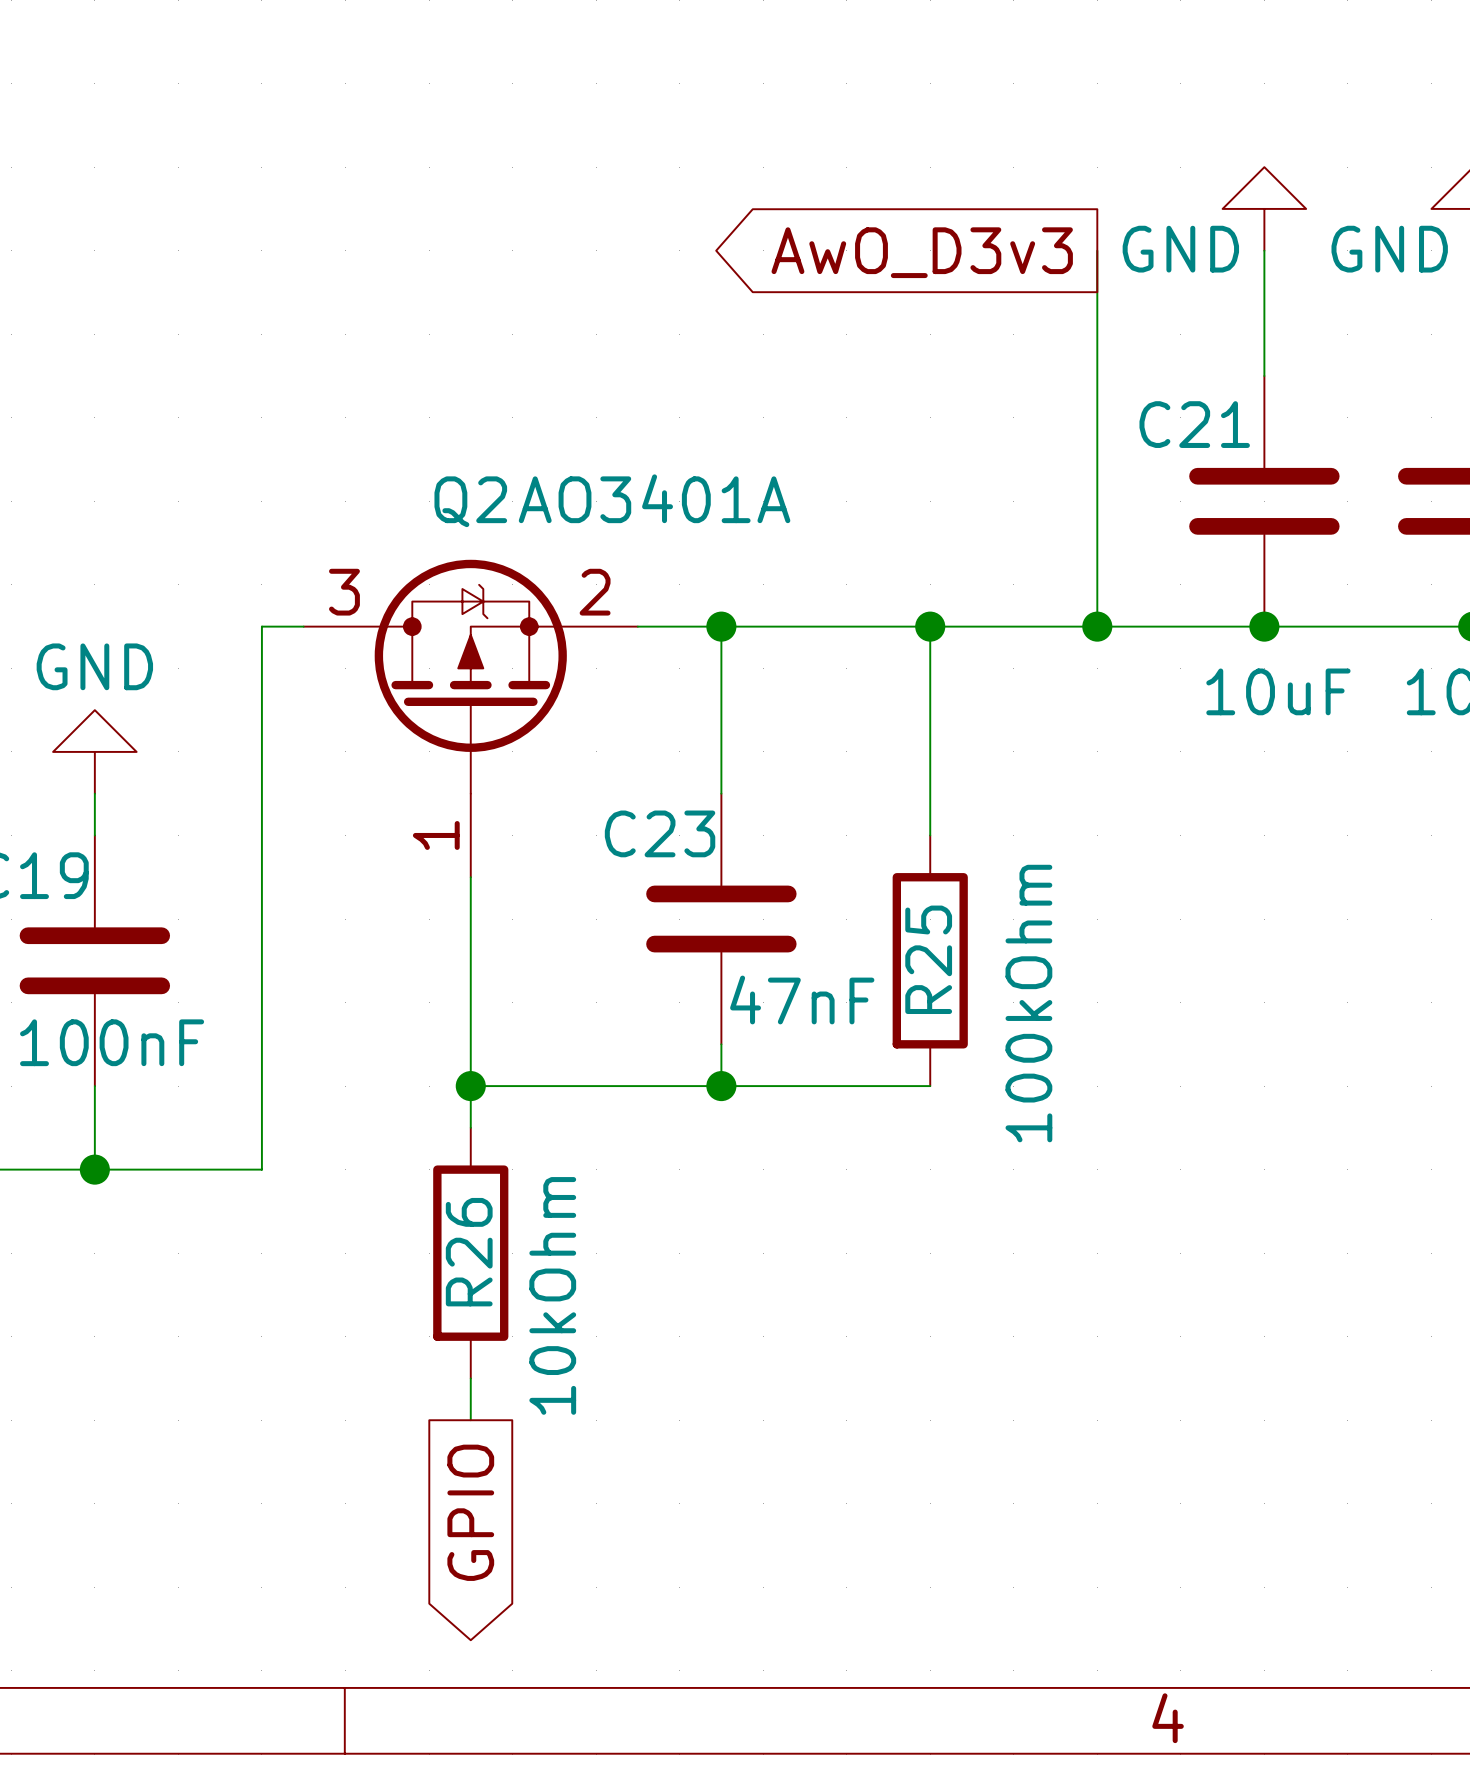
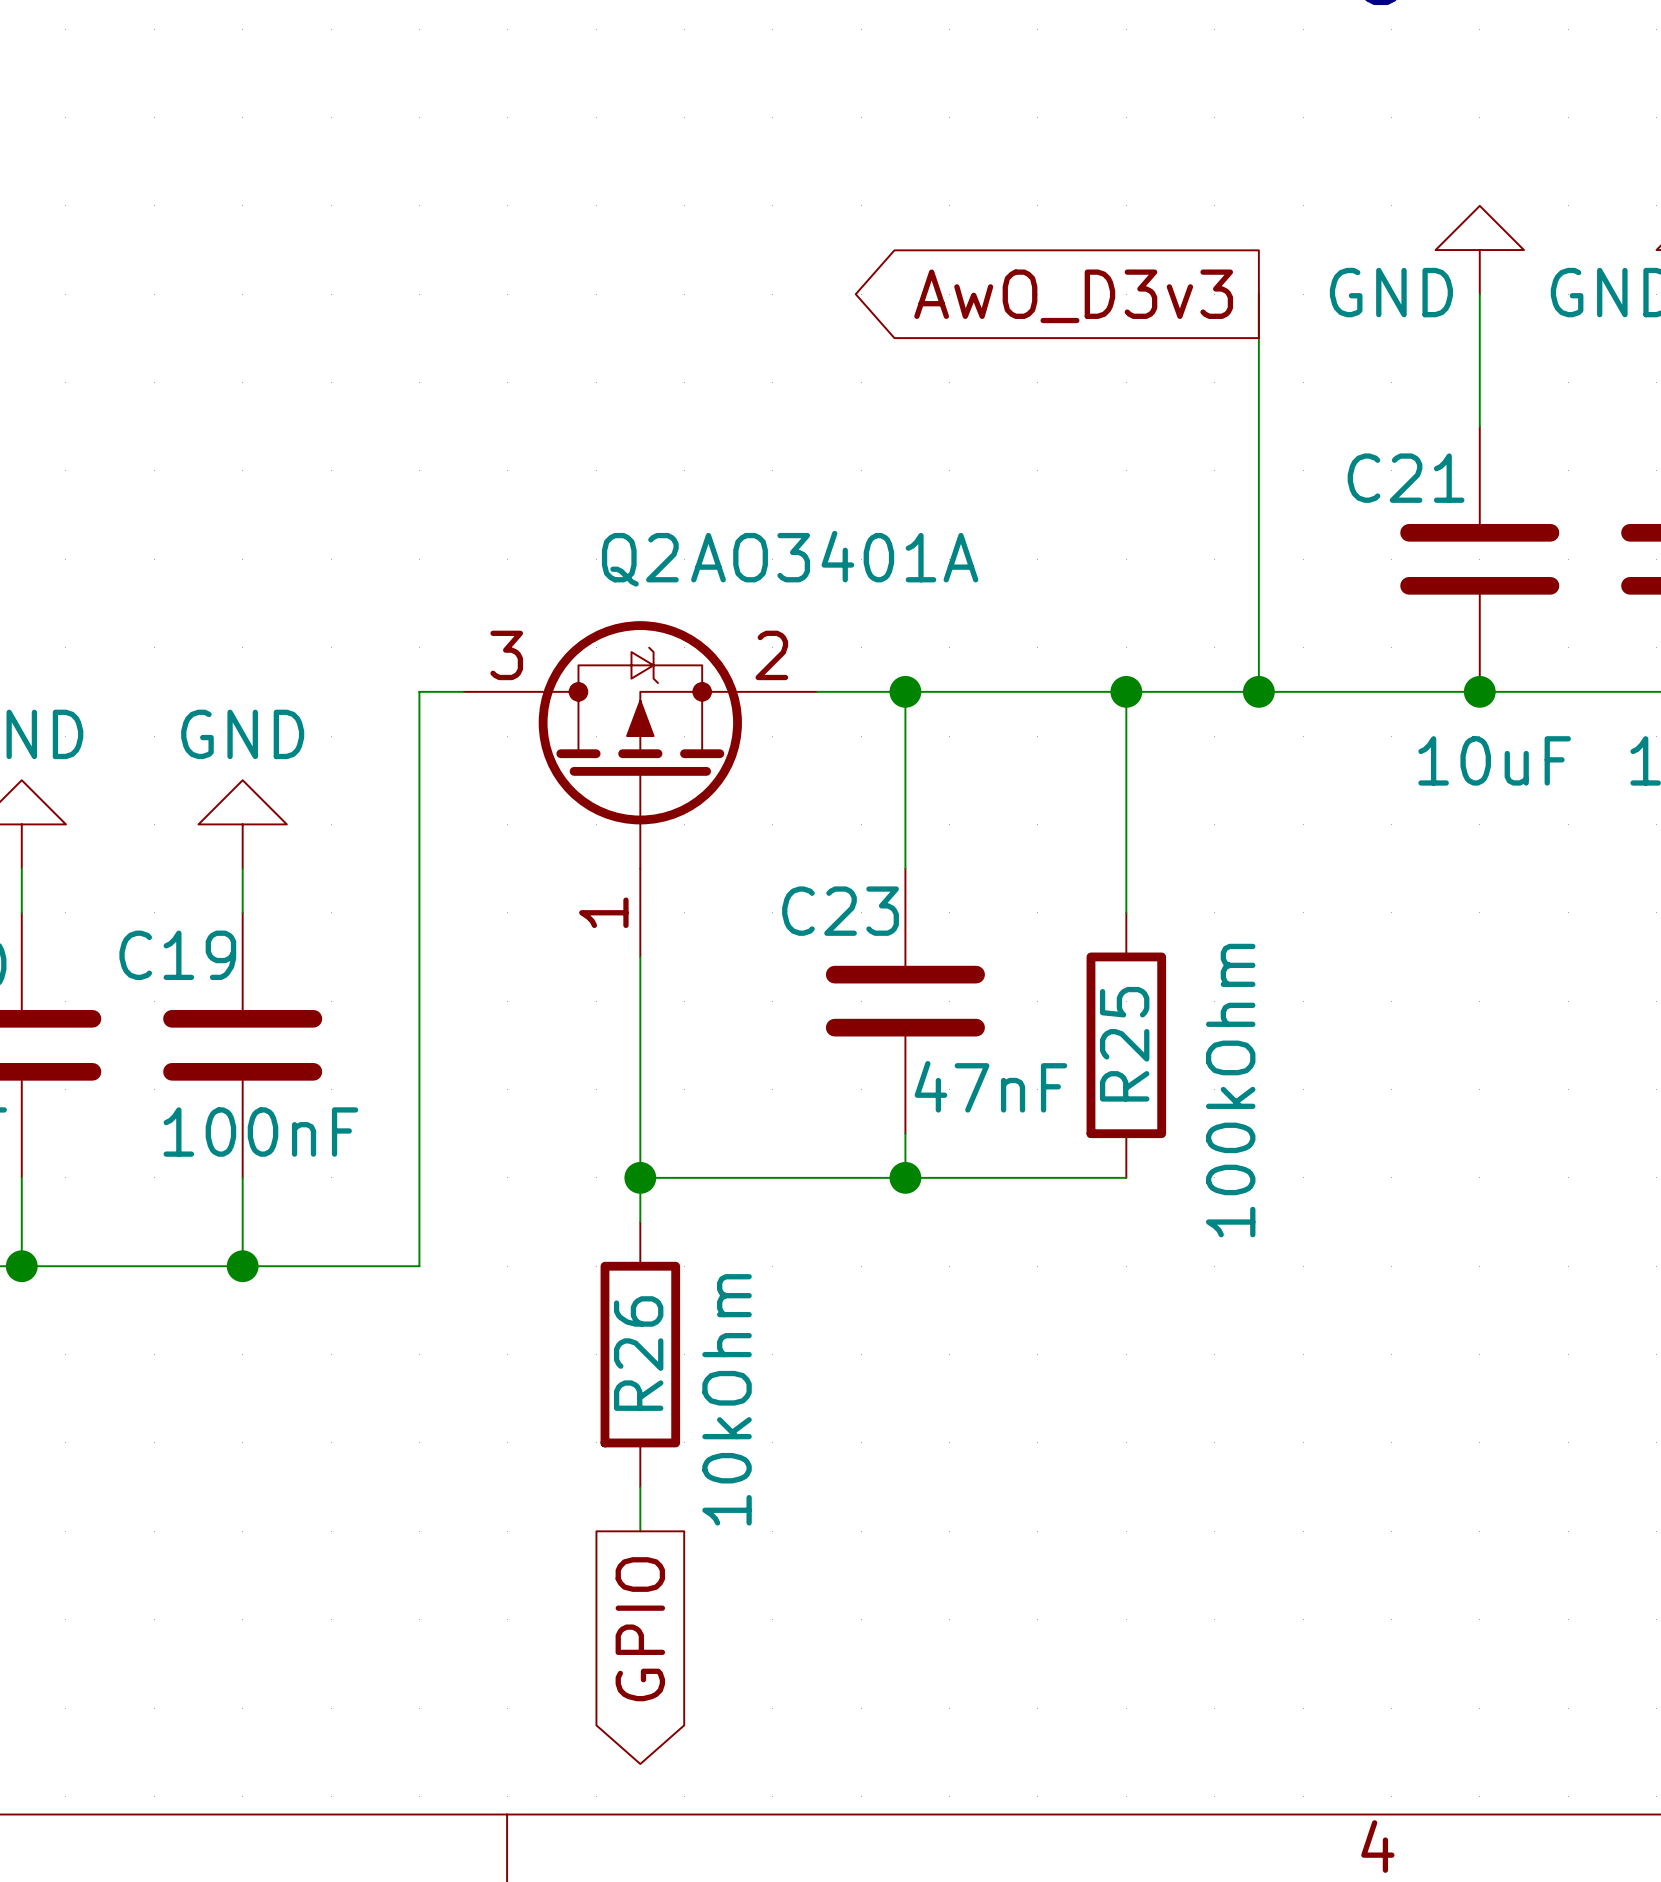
wire: (1097, 250) (1097, 626) -> (1258, 294) (1258, 691)
global label position: AwO_D3v3 (922, 252) -> AwO_D3v3 (1073, 296)
junction position: (1097, 626) -> (1258, 691)

